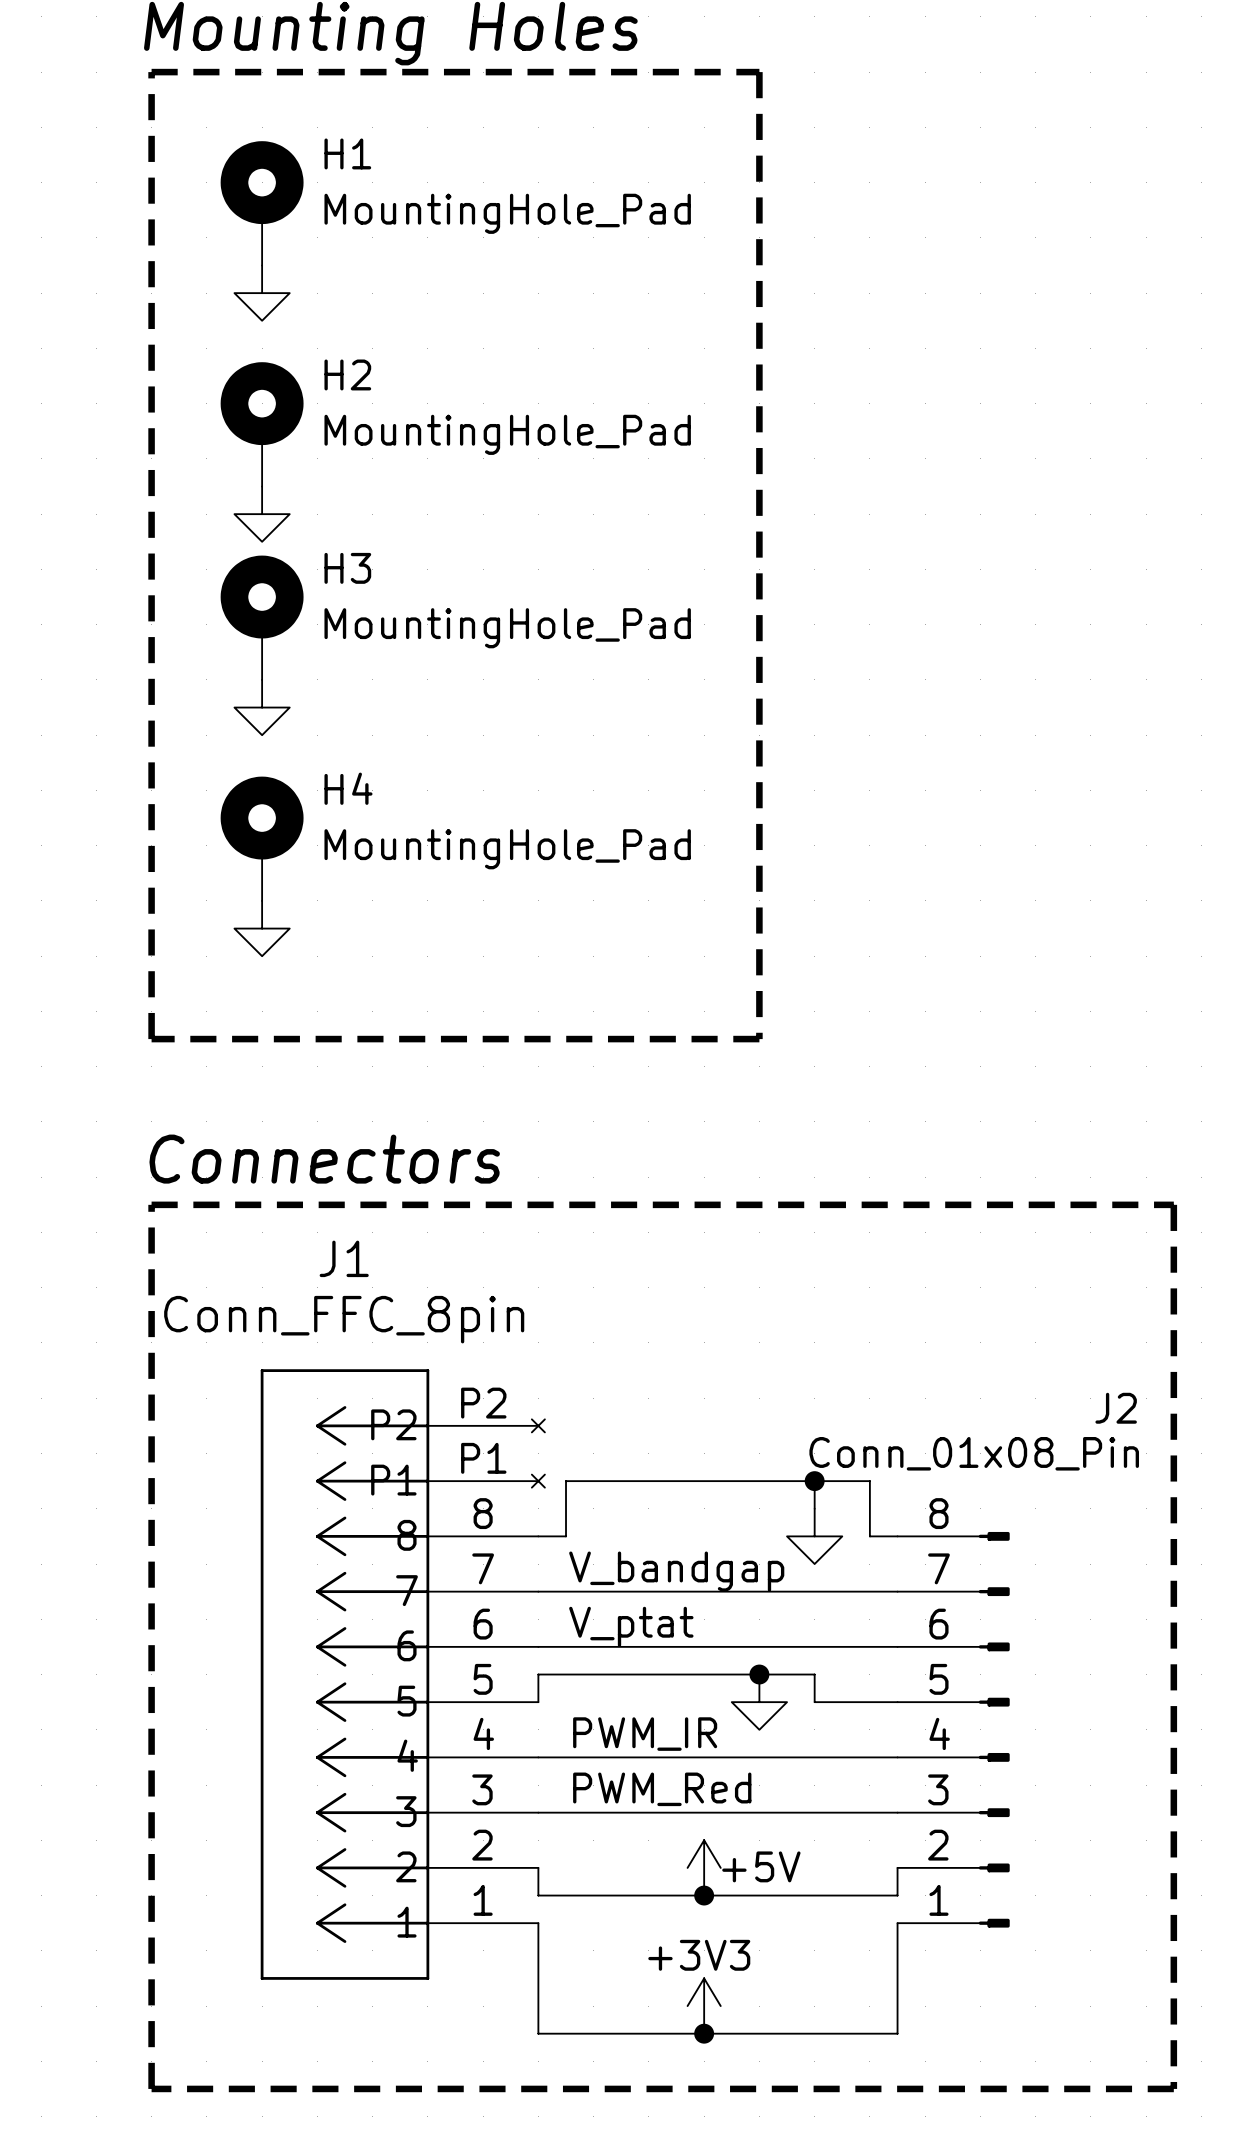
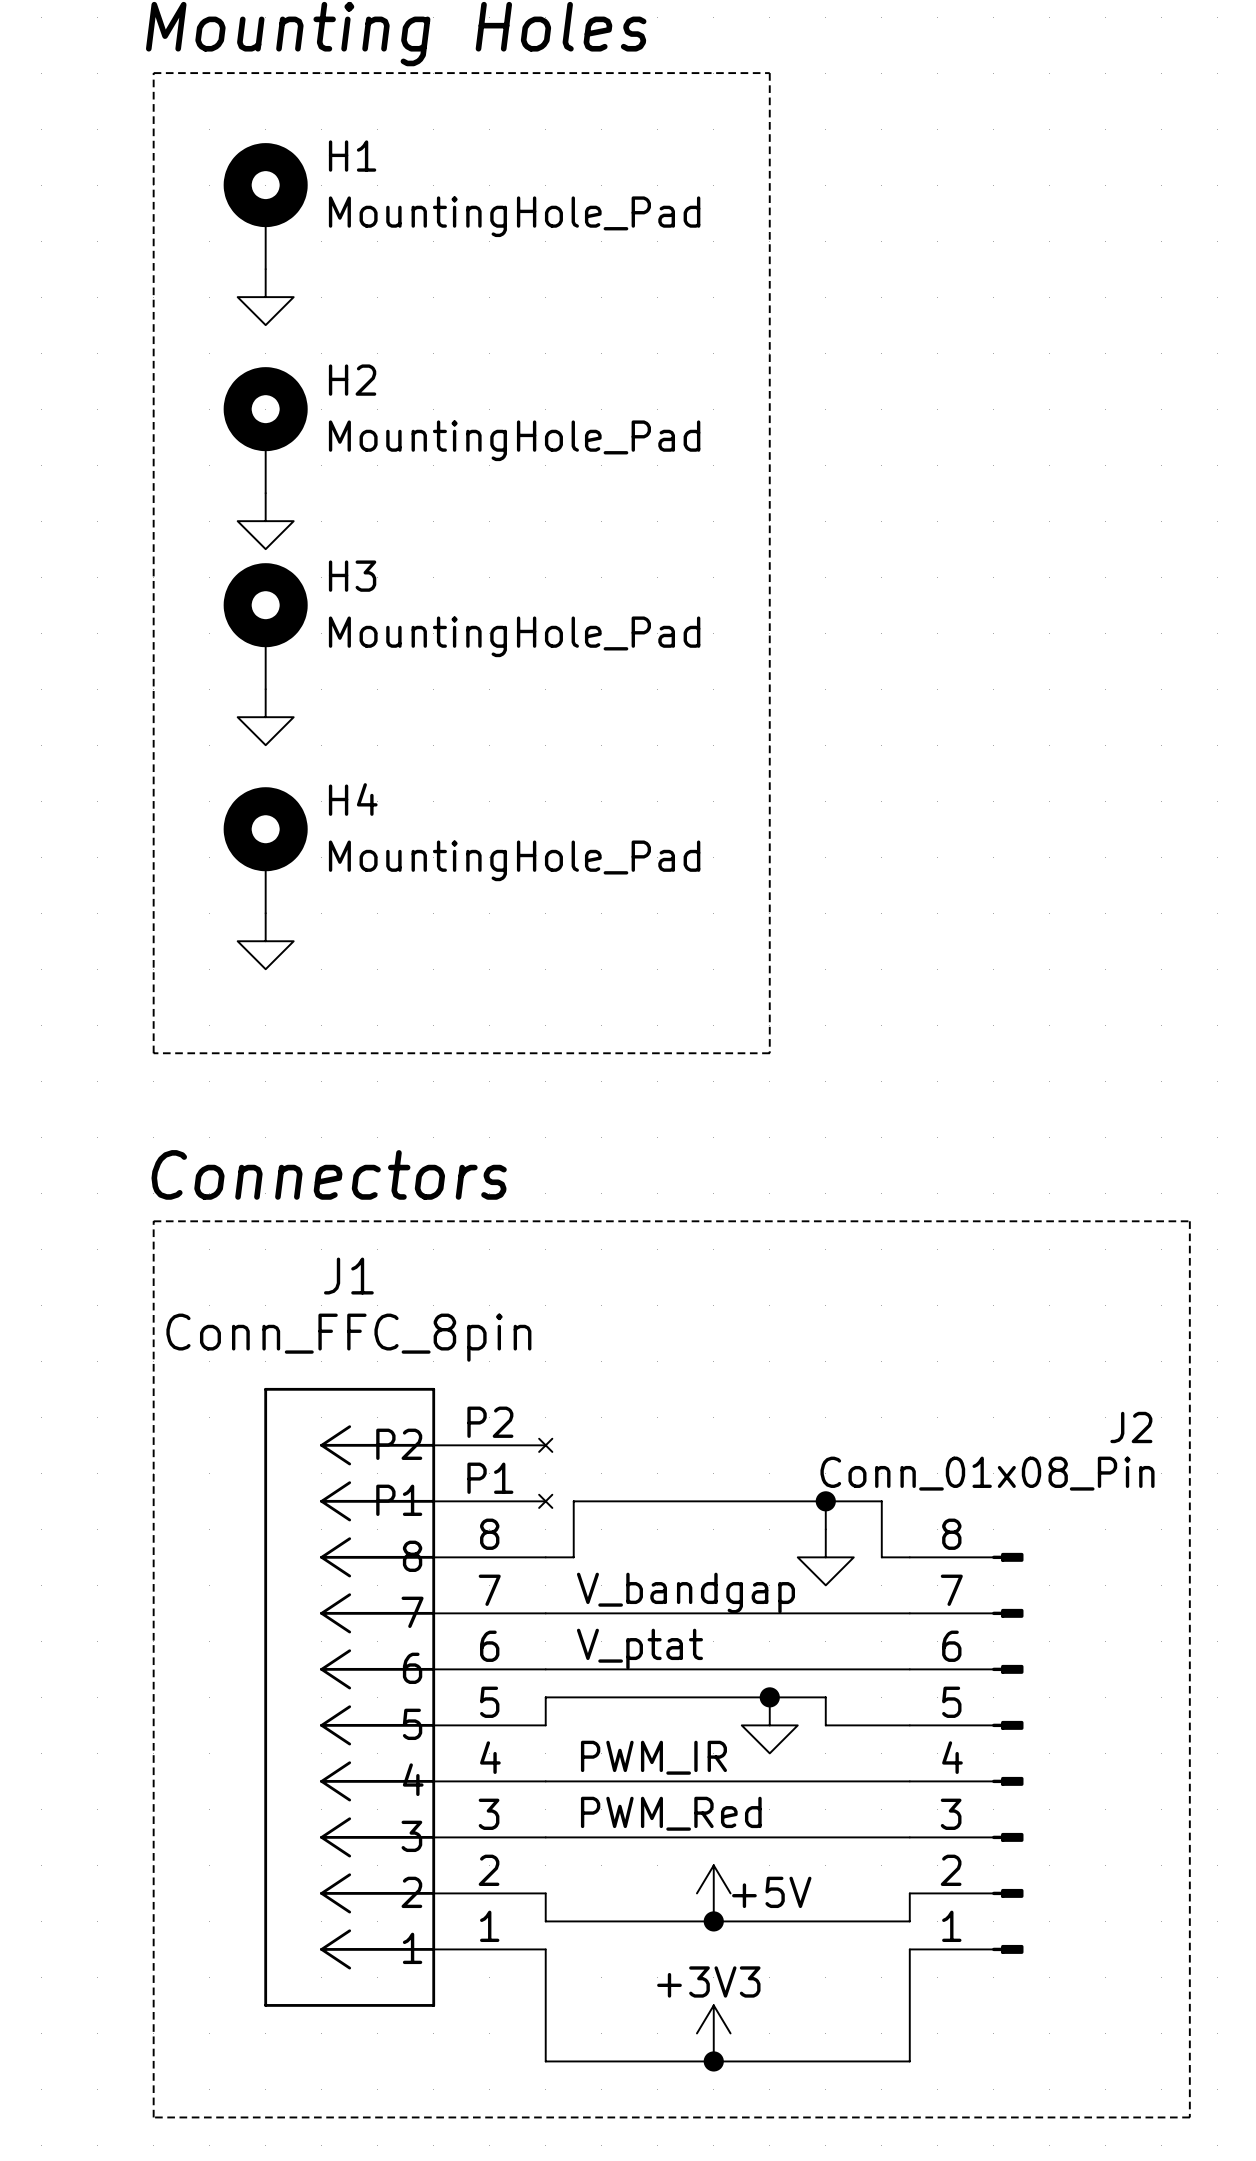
line width: thick (151, 72) (759, 72) (759, 1039) (151, 1039) (151, 72) -> thin (153, 73) (769, 73) (769, 1053) (153, 1053) (153, 73)
line width: thick (151, 1204) (151, 2088) (1173, 2088) (1173, 1204) (151, 1204) -> thin (153, 1221) (153, 2117) (1189, 2117) (1189, 1221) (153, 1221)

